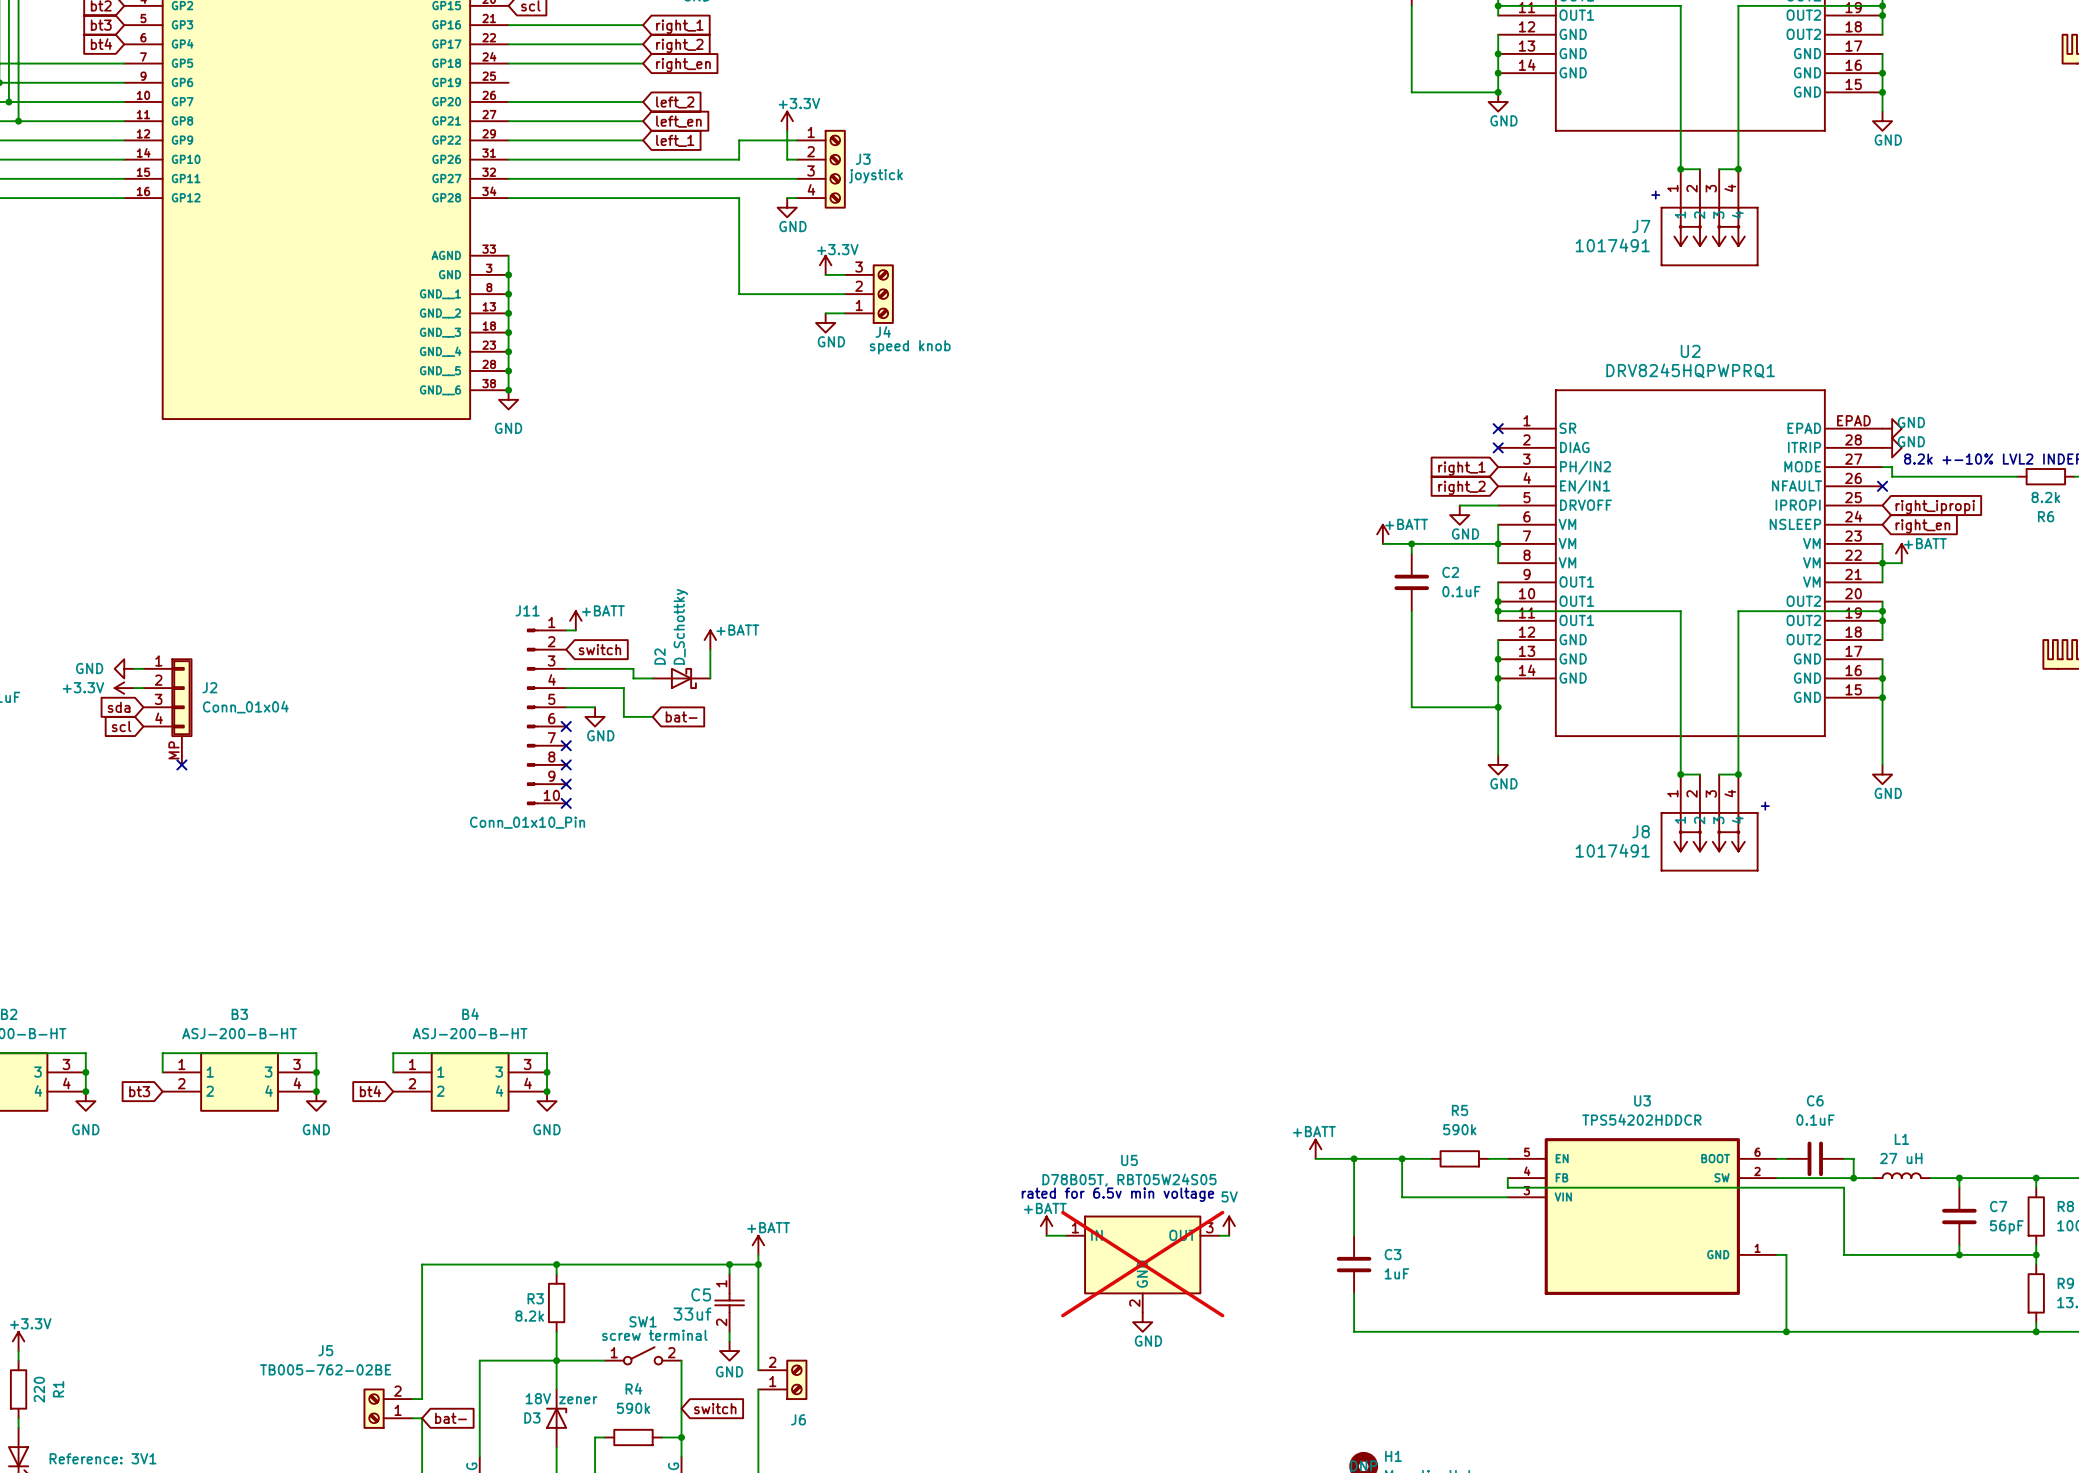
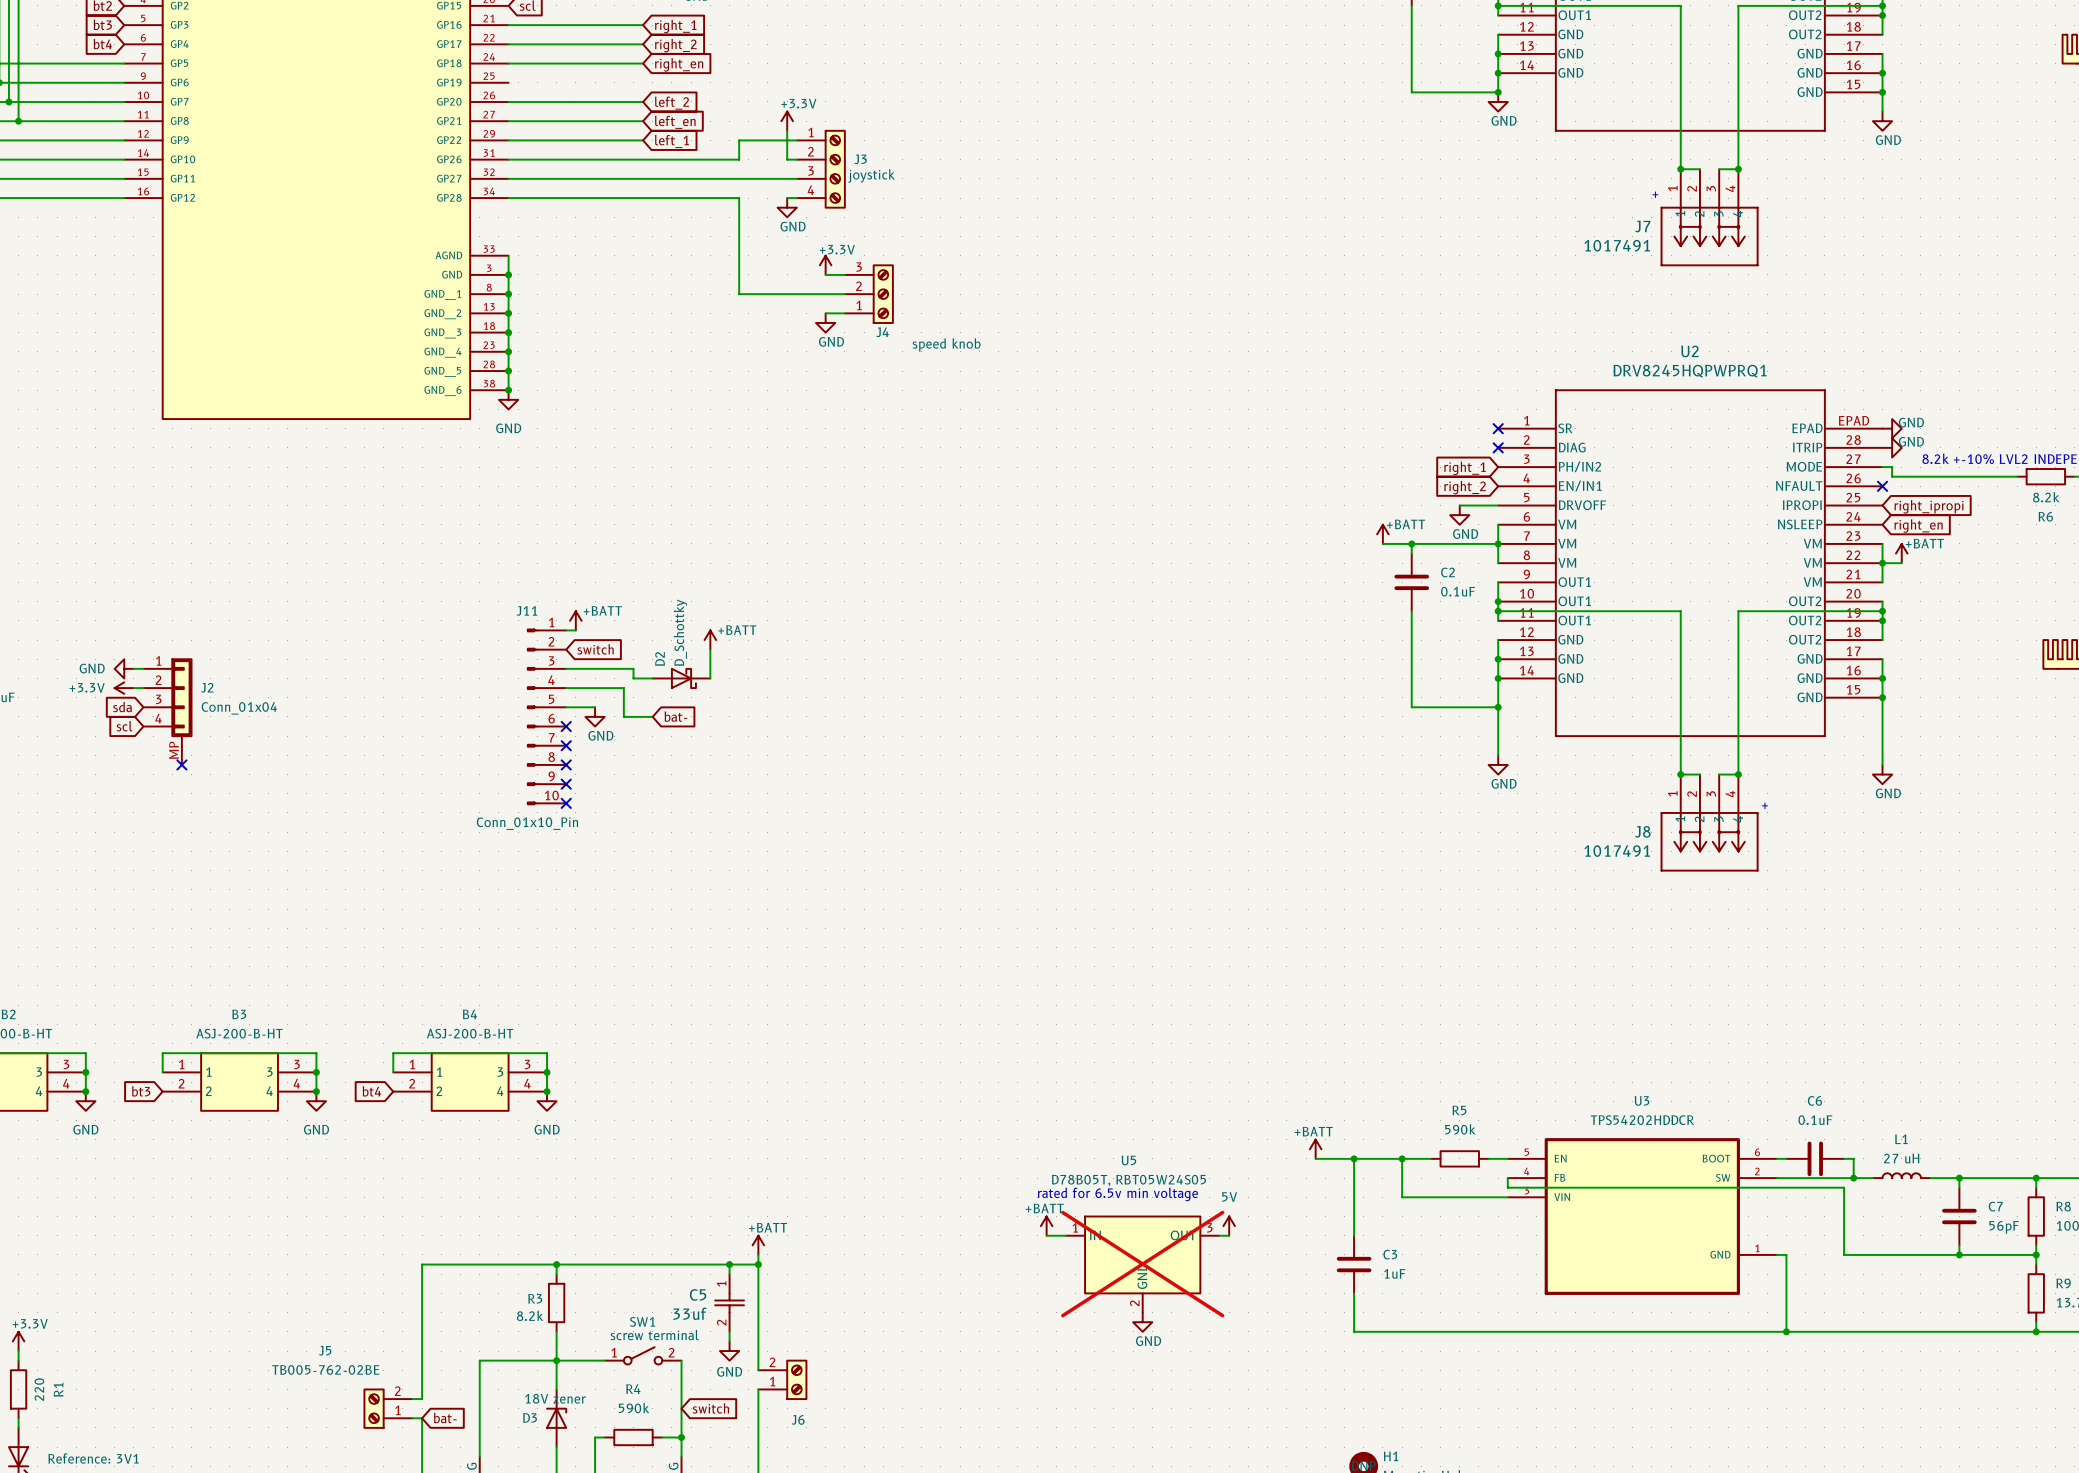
J4 value position: speed knob (910, 347) -> speed knob (946, 345)

